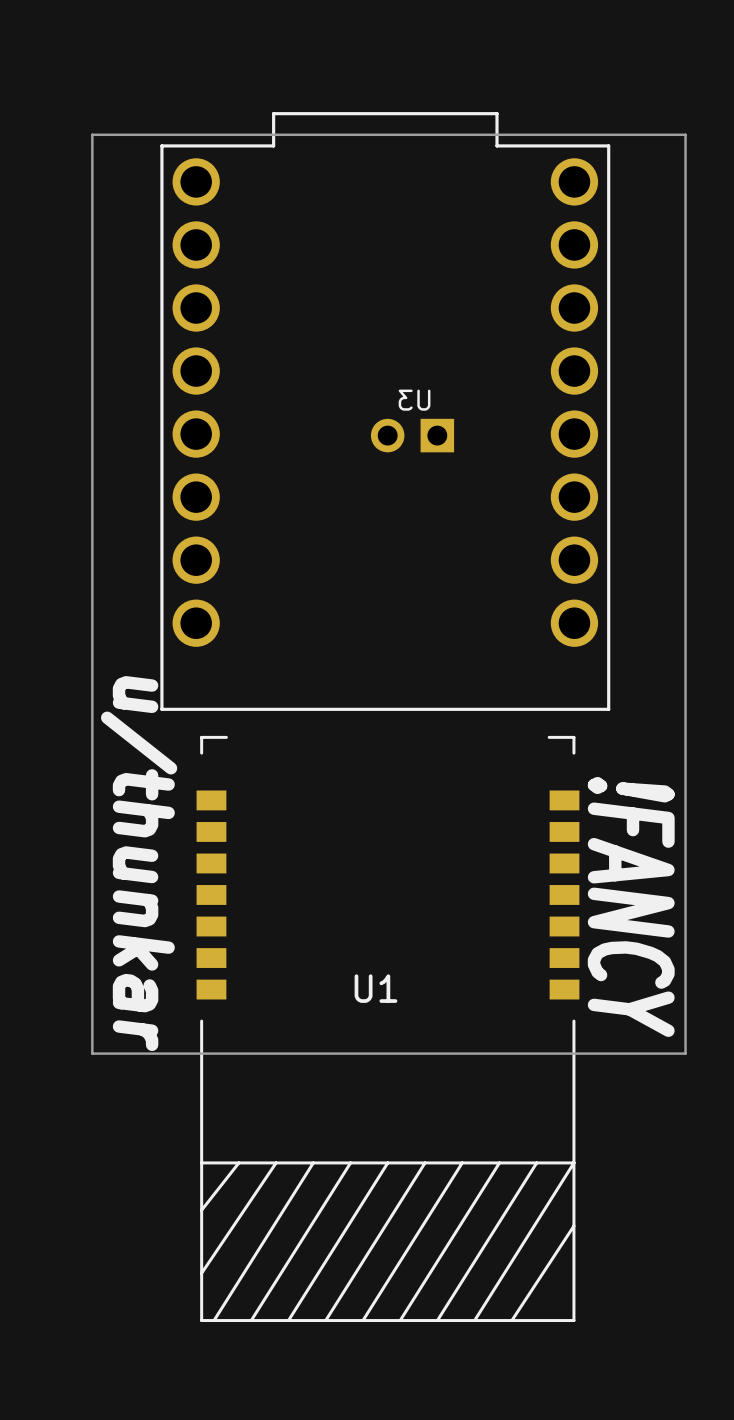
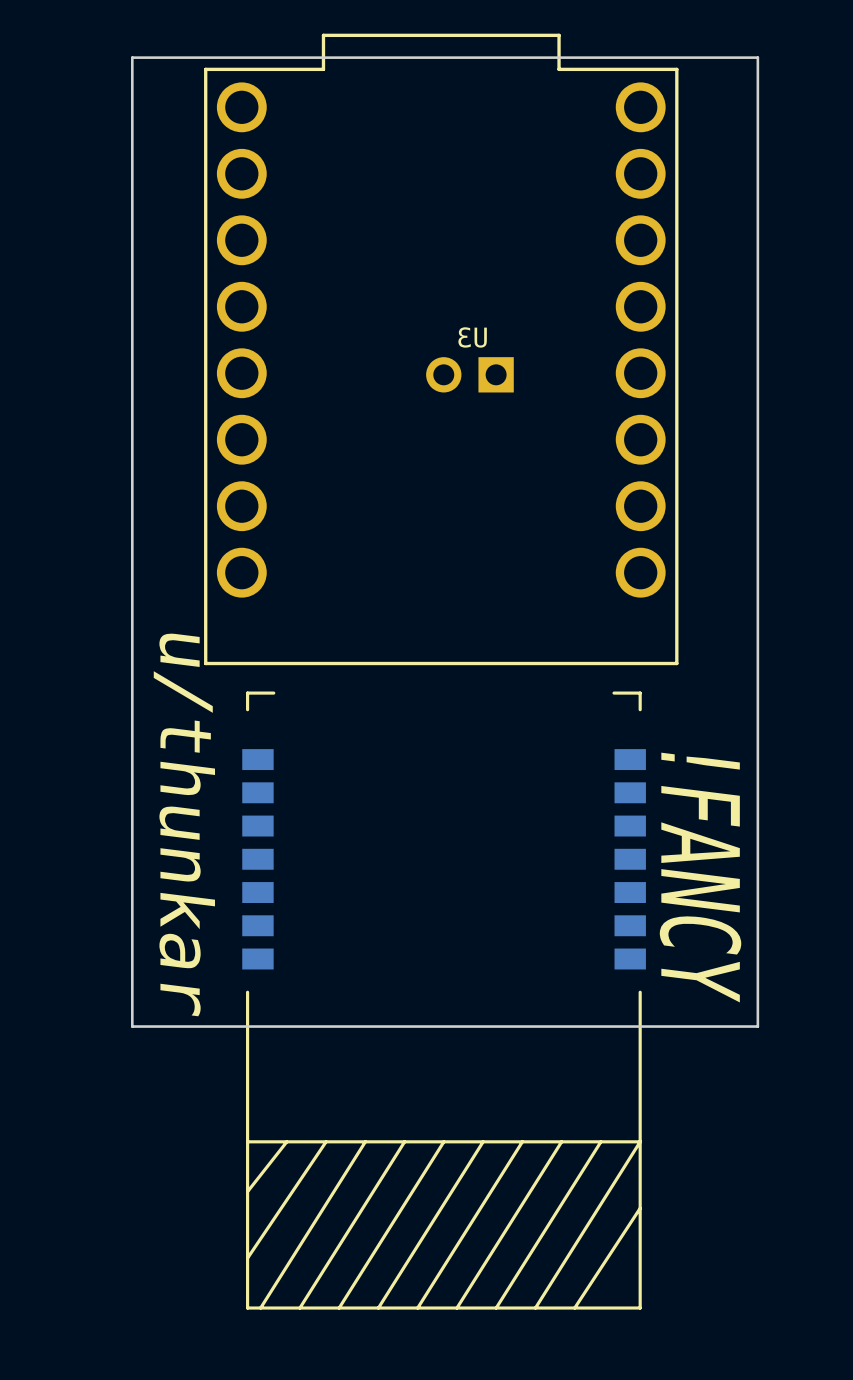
U1 name: U1 (375, 988) -> none

